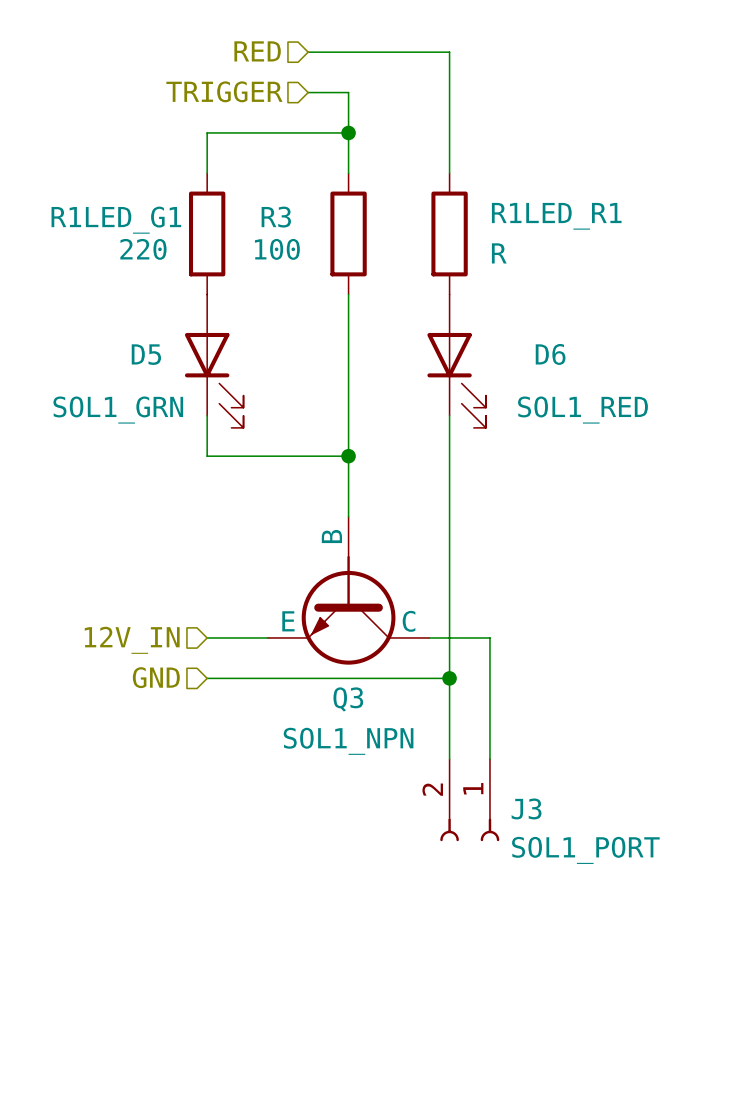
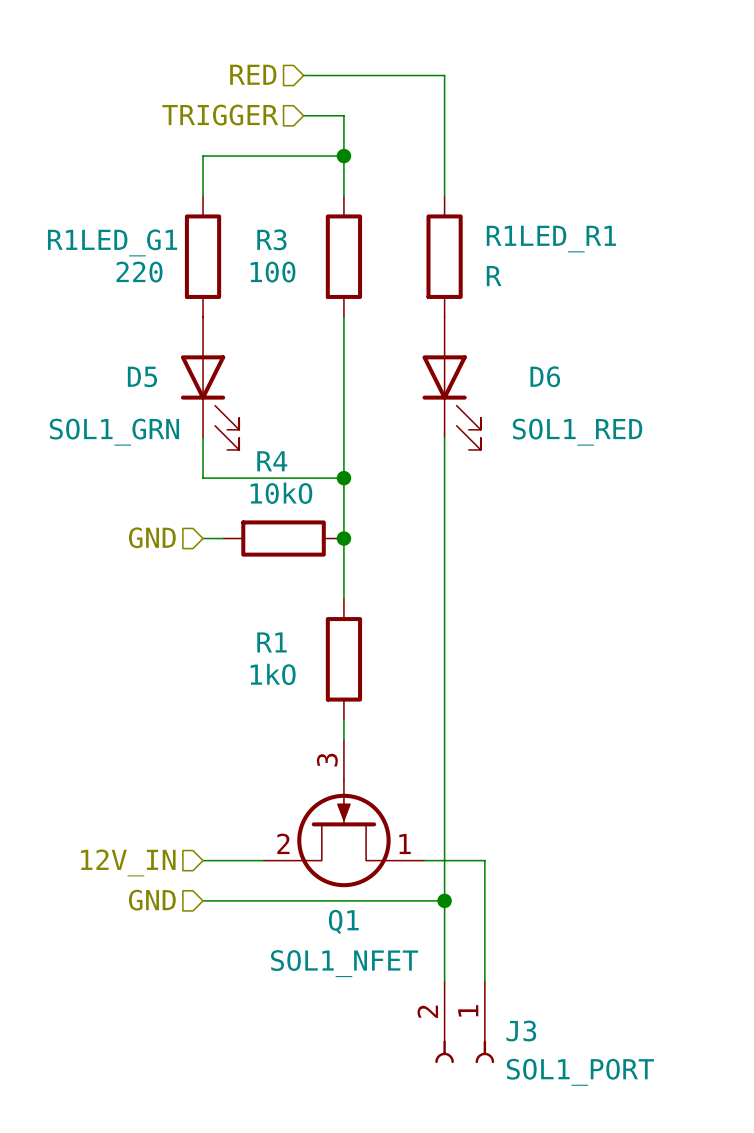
hierarchical label: none -> GND (152, 537)
wire: none -> (203, 538) (223, 538)
R4: none -> 10kO (283, 538)
junction: none -> (343, 538)
Q3: SOL1_NPN (348, 590) -> none
wire: (207, 637) (267, 637) -> (203, 860) (263, 860)
R1: none -> 1kO (343, 659)
wire: (429, 637) (489, 637) (489, 759) -> (424, 860) (484, 860) (484, 981)
hierarchical label position: 12V_IN (132, 640) -> 12V_IN (128, 862)
hierarchical label: GND (156, 677) -> none
wire: (207, 678) (449, 678) -> (203, 900) (444, 900)
junction: (449, 678) -> none
wire: none -> (343, 719) (343, 739)
wire: none -> (444, 780) (444, 981)
Q1: none -> SOL1_NFET (343, 813)
J3 position: (469, 800) -> (464, 1022)
hierarchical label: none -> GND (152, 900)
junction: none -> (444, 900)

